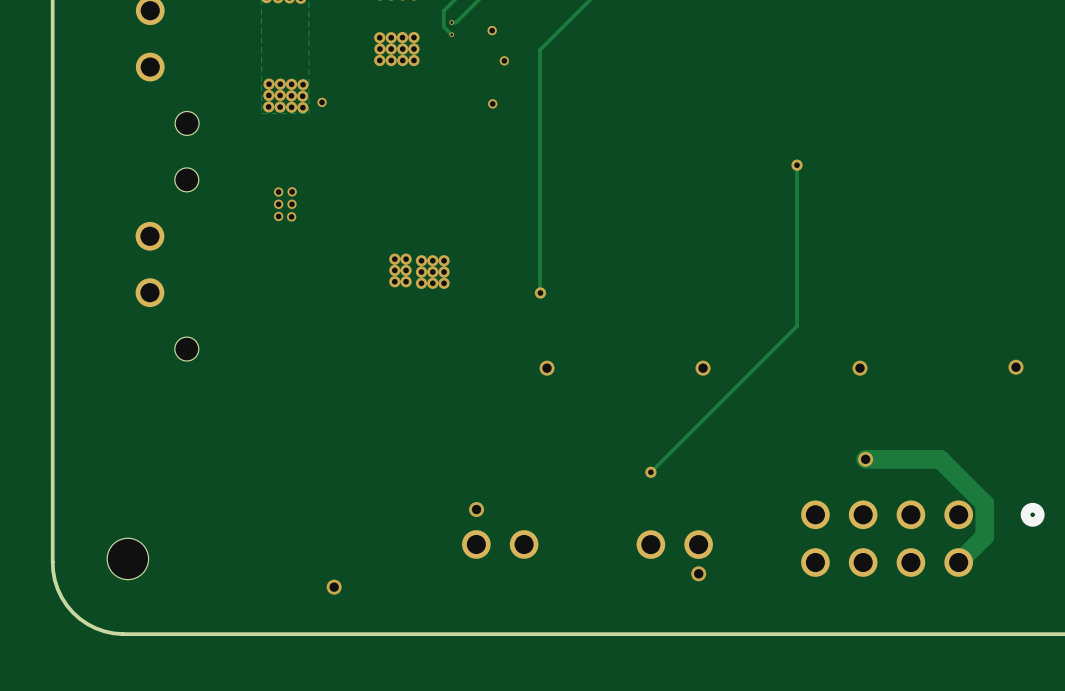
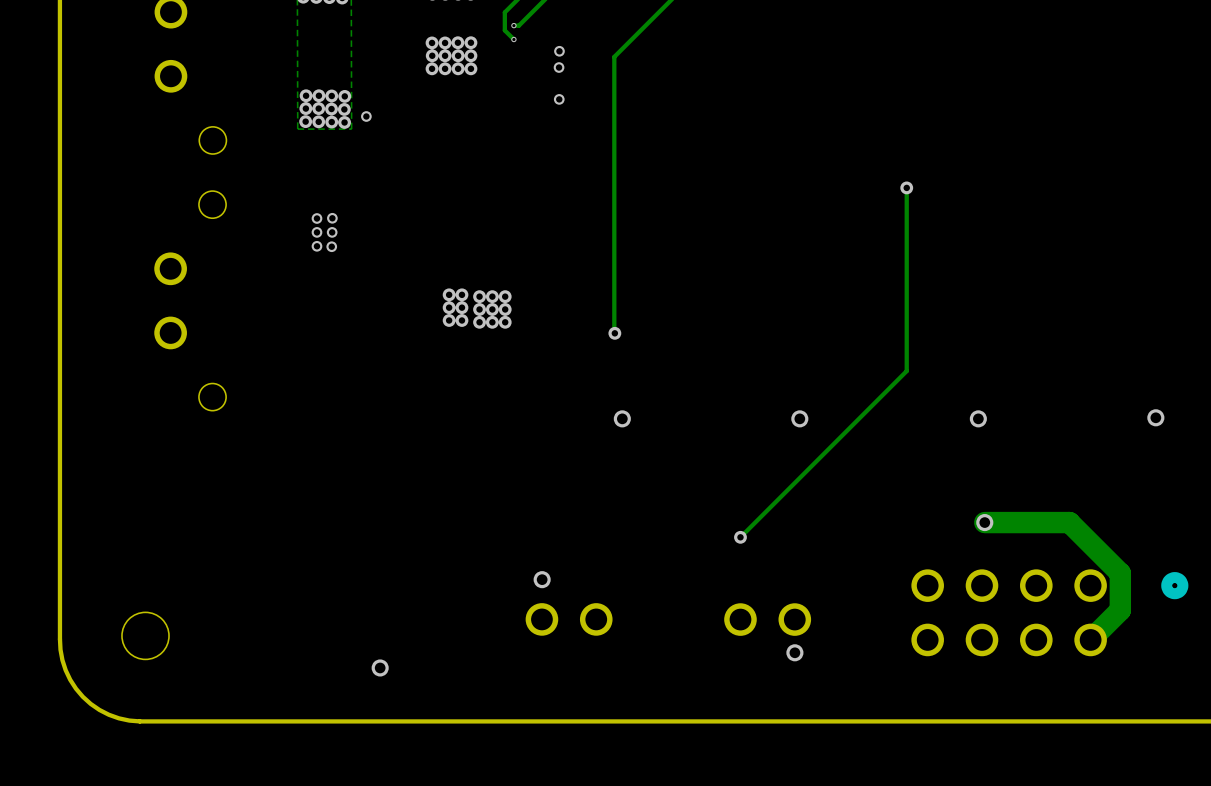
via: (492, 30) -> none
via: none -> (559, 51)
via: none -> (559, 67)
via: (504, 60) -> none
via: none -> (559, 99)
via: (492, 103) -> none

